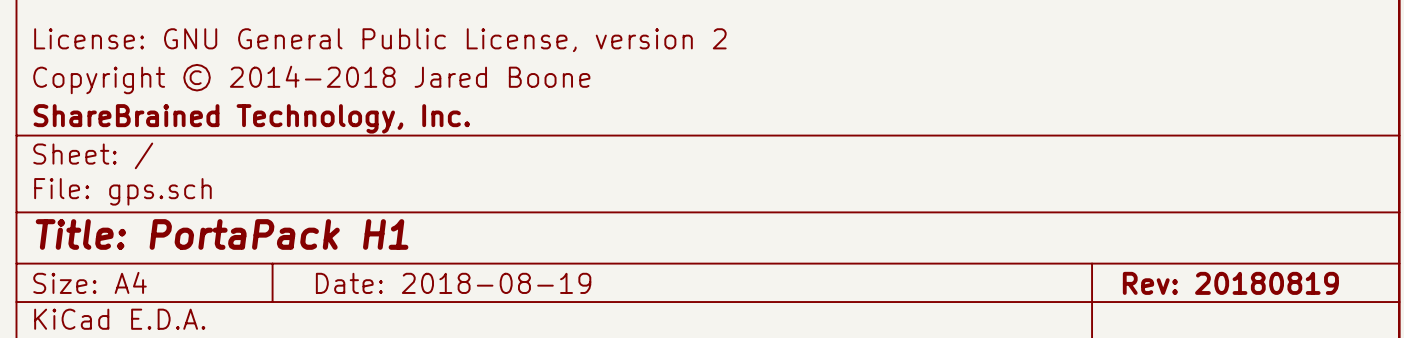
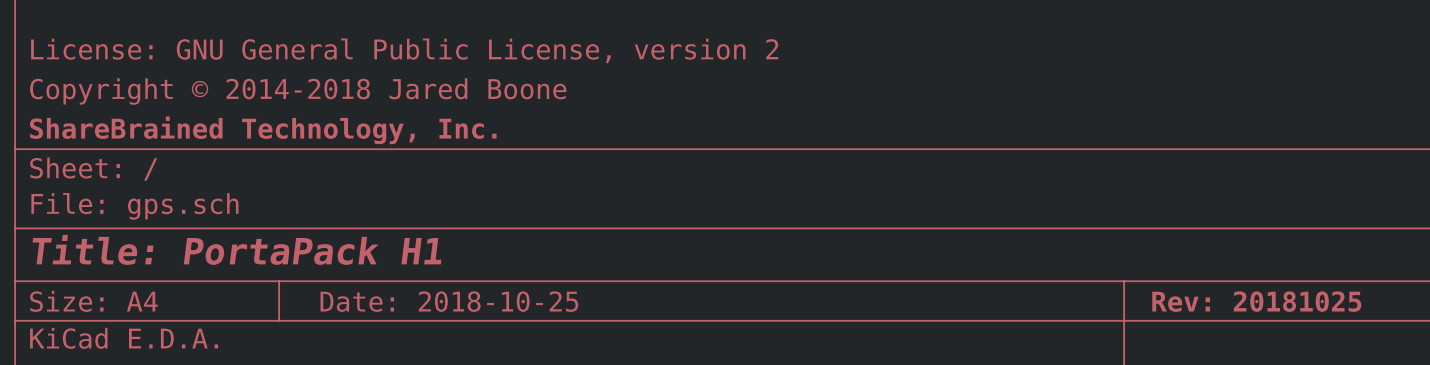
title block: Date: 2018-08-19 (453, 283) -> Date: 2018-10-25 (449, 301)
title block: Rev: 20180819 (1230, 283) -> Rev: 20181025 (1256, 301)

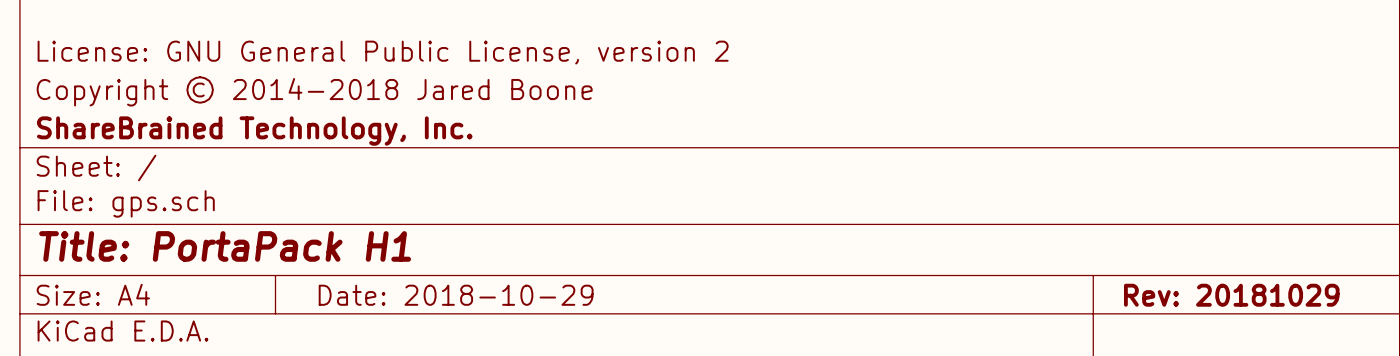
title block: Date: 2018-10-25 (449, 301) -> Date: 2018-10-29 (456, 295)
title block: Rev: 20181025 (1256, 301) -> Rev: 20181029 (1231, 295)

